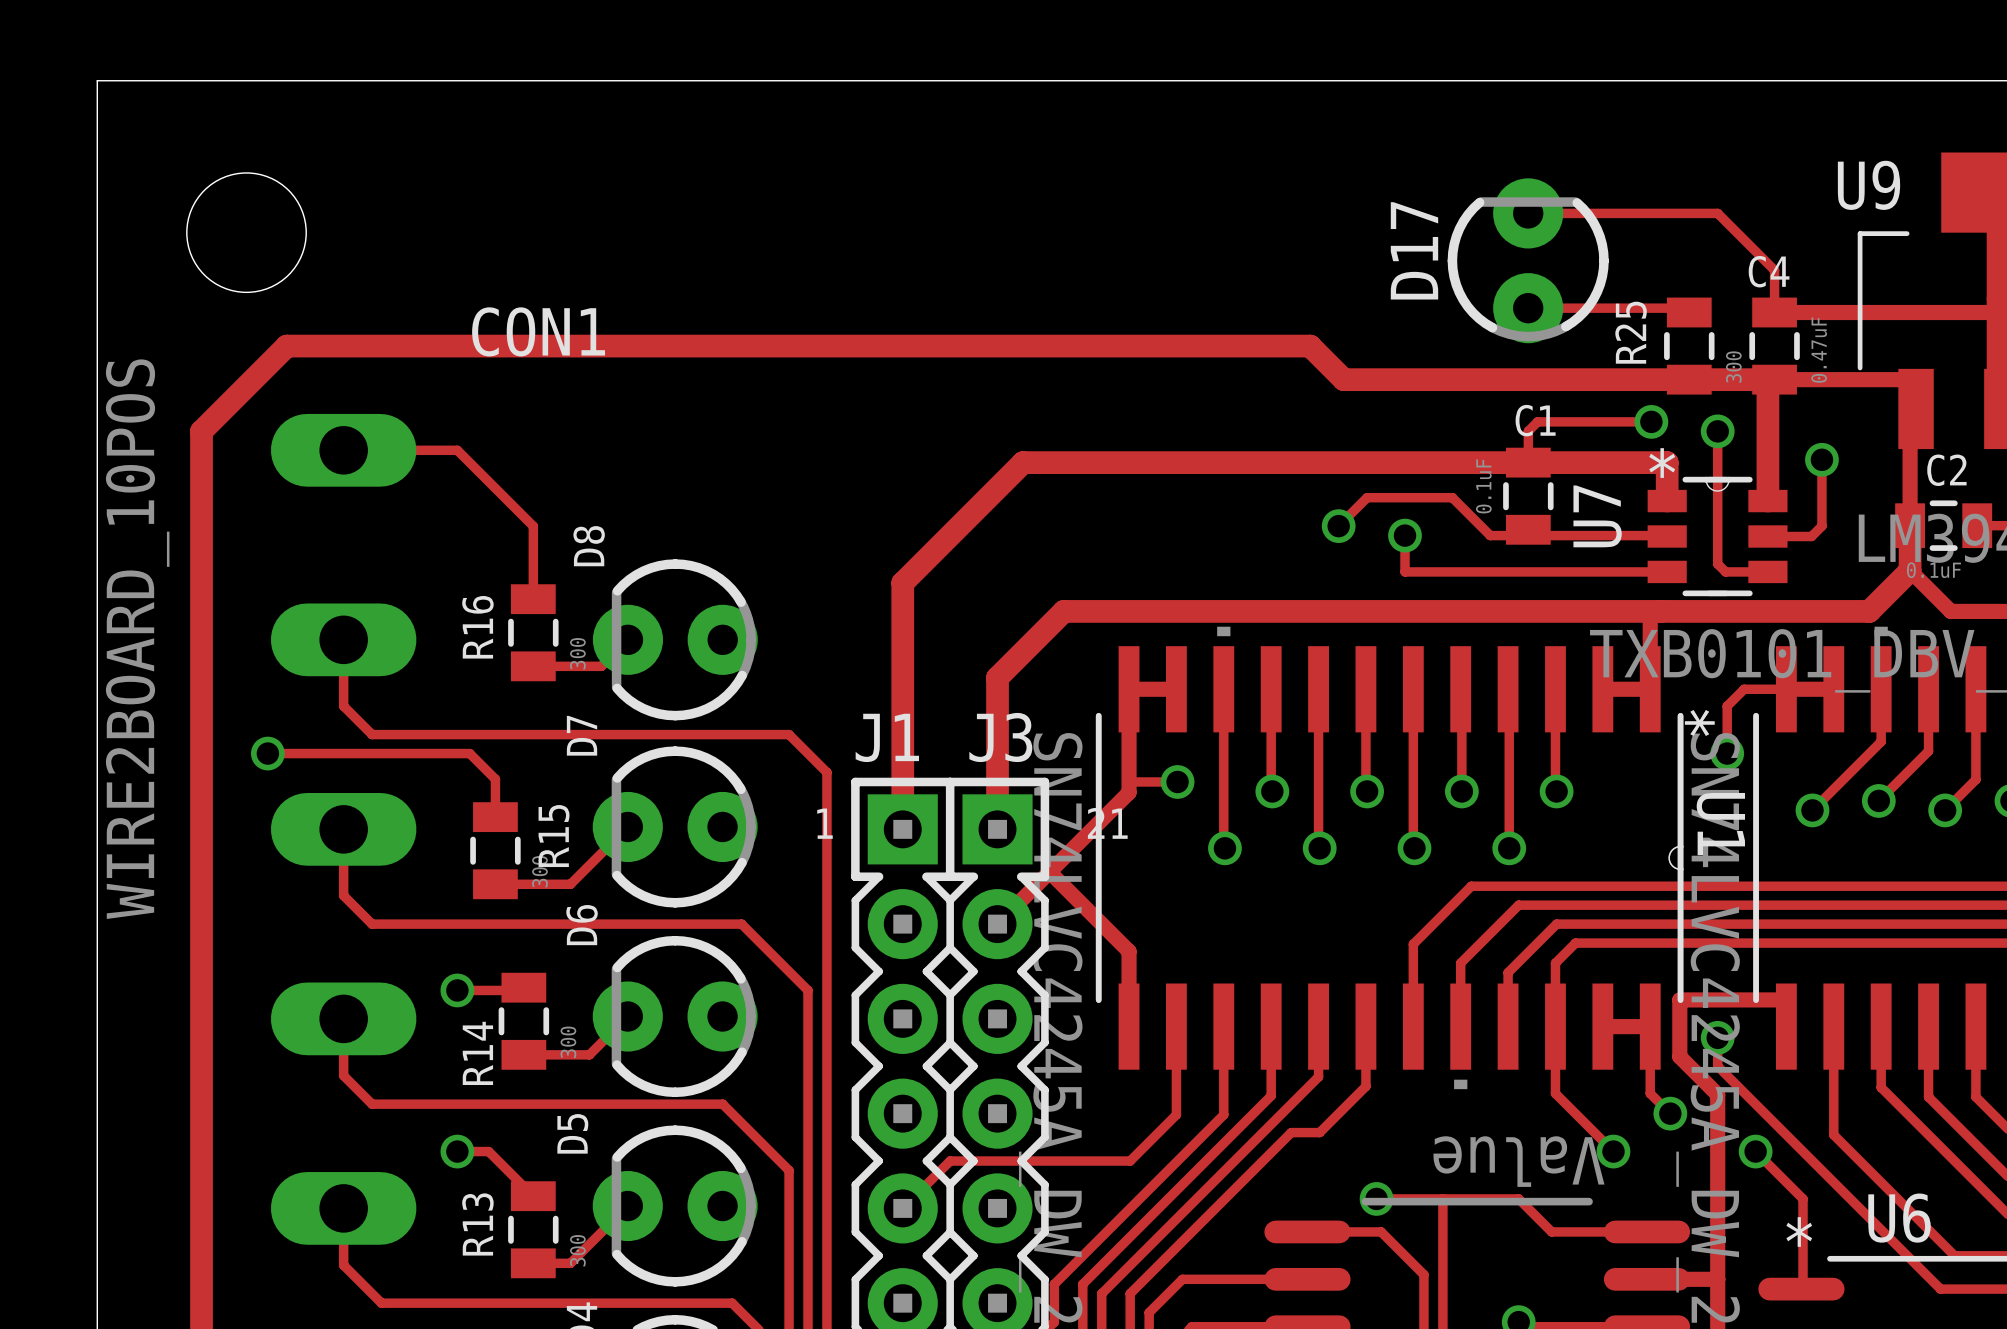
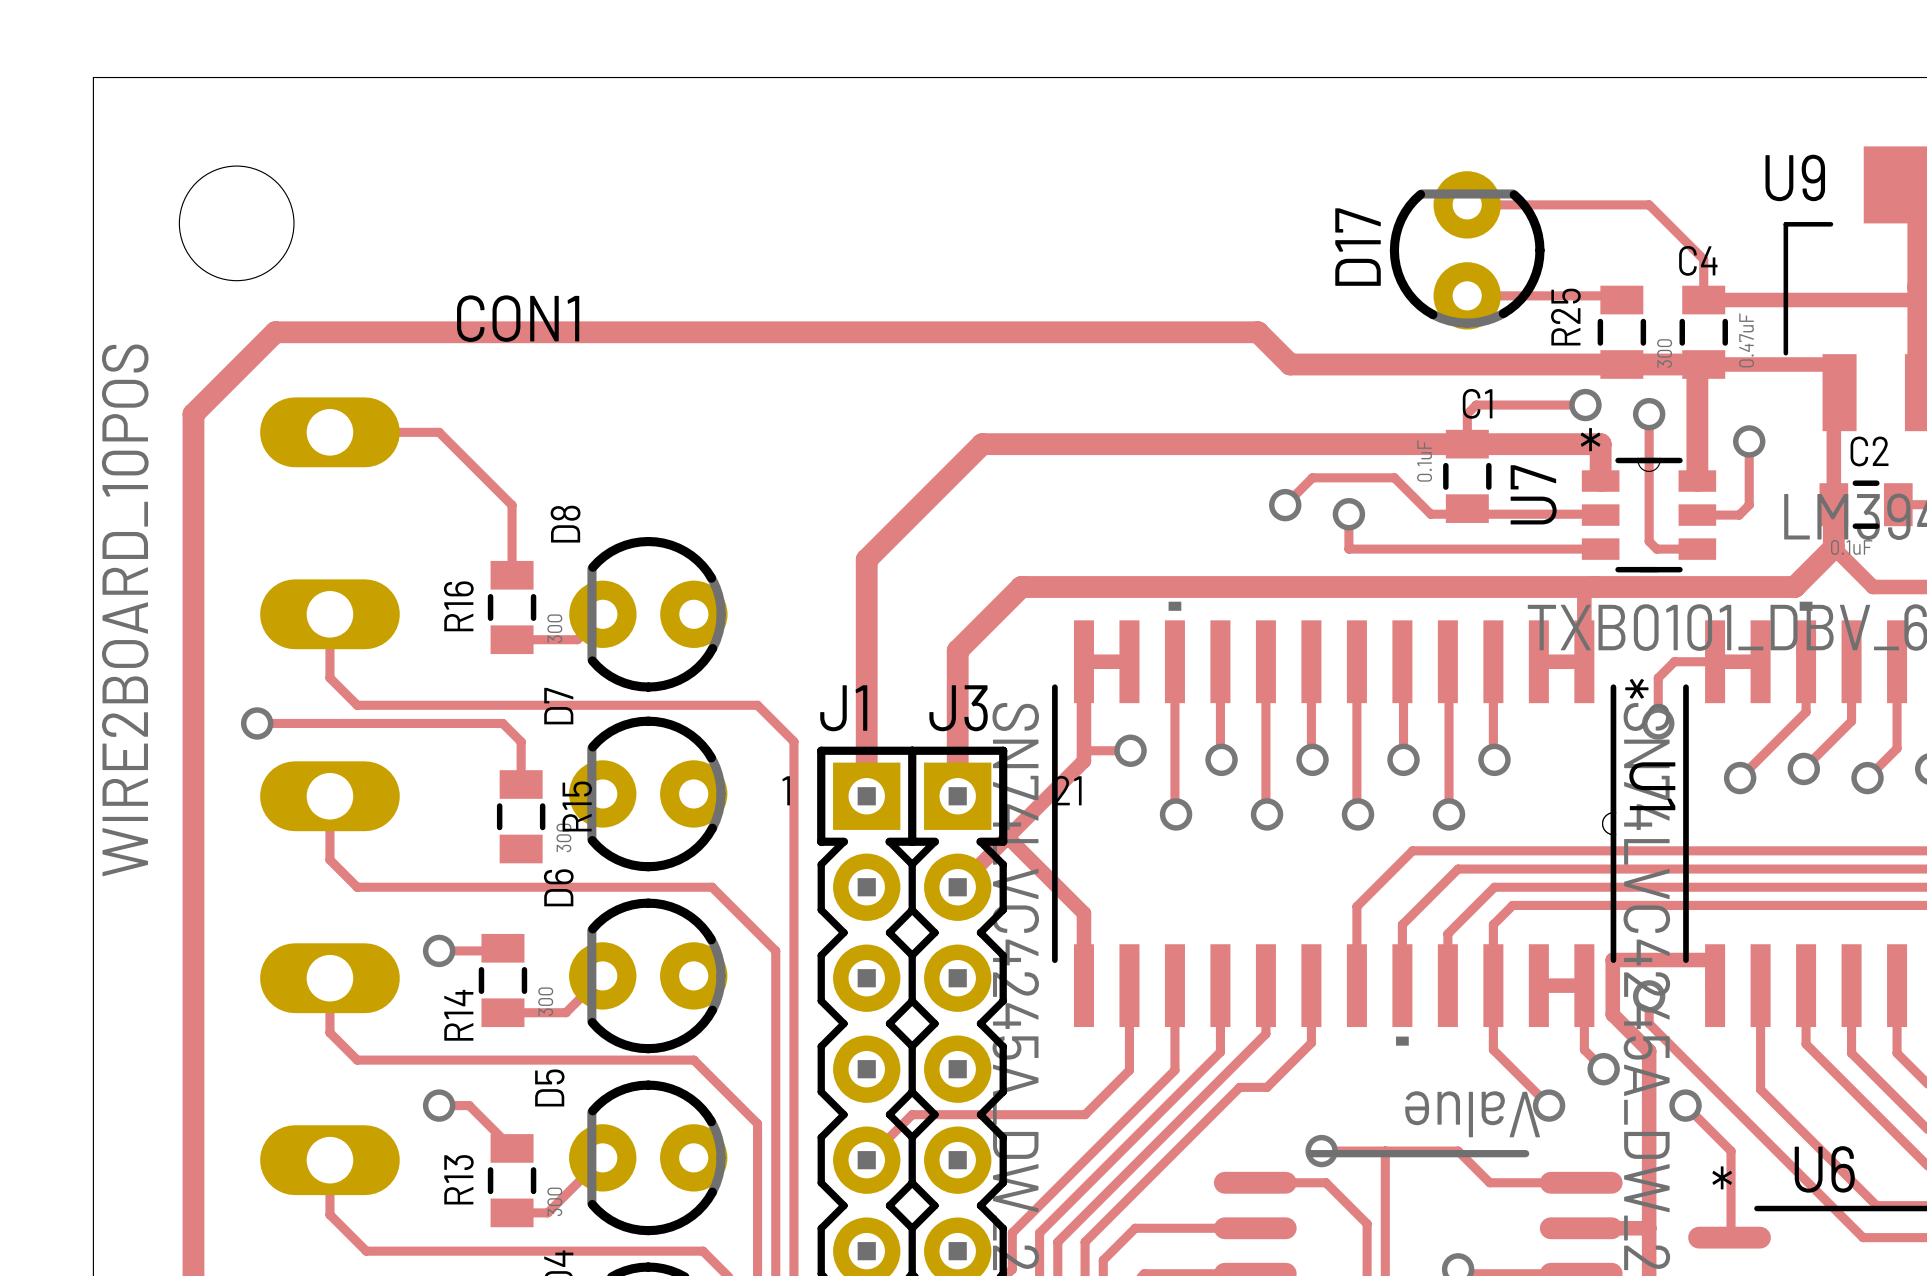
track: (469, 753) (495, 779) (495, 817) -> (451, 723) (502, 723) (521, 741) (521, 784)
track: (627, 826) (570, 884) (495, 884) -> none
R15 position: (495, 850) -> (521, 816)

